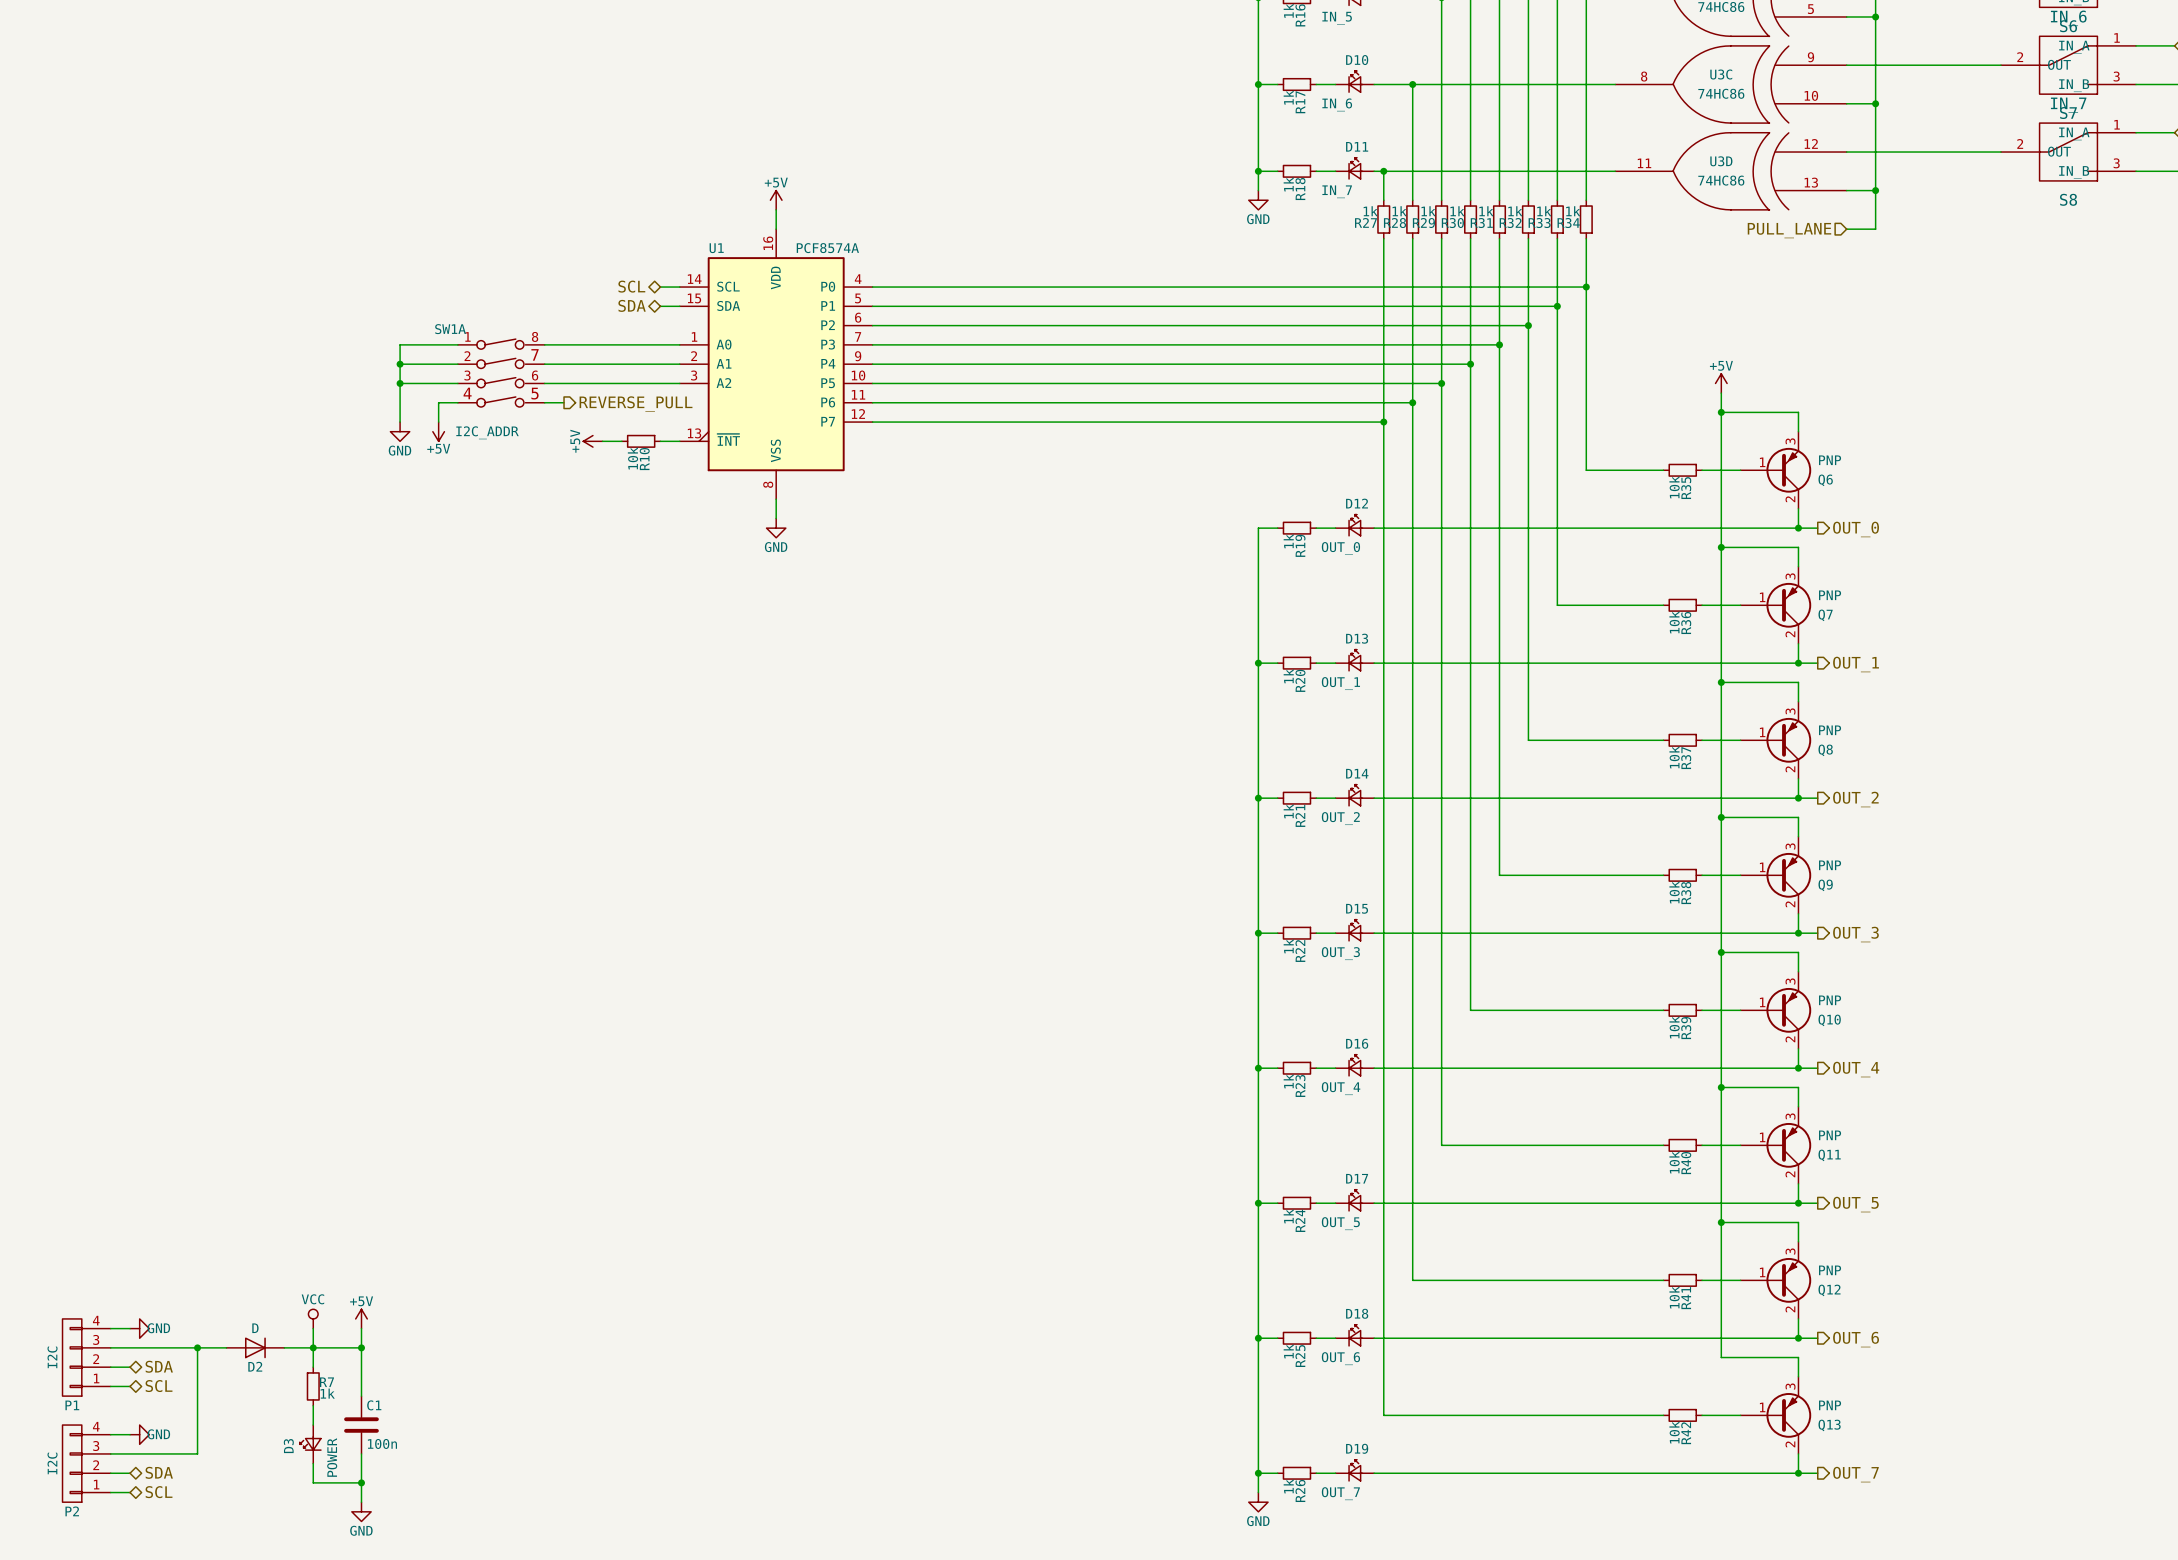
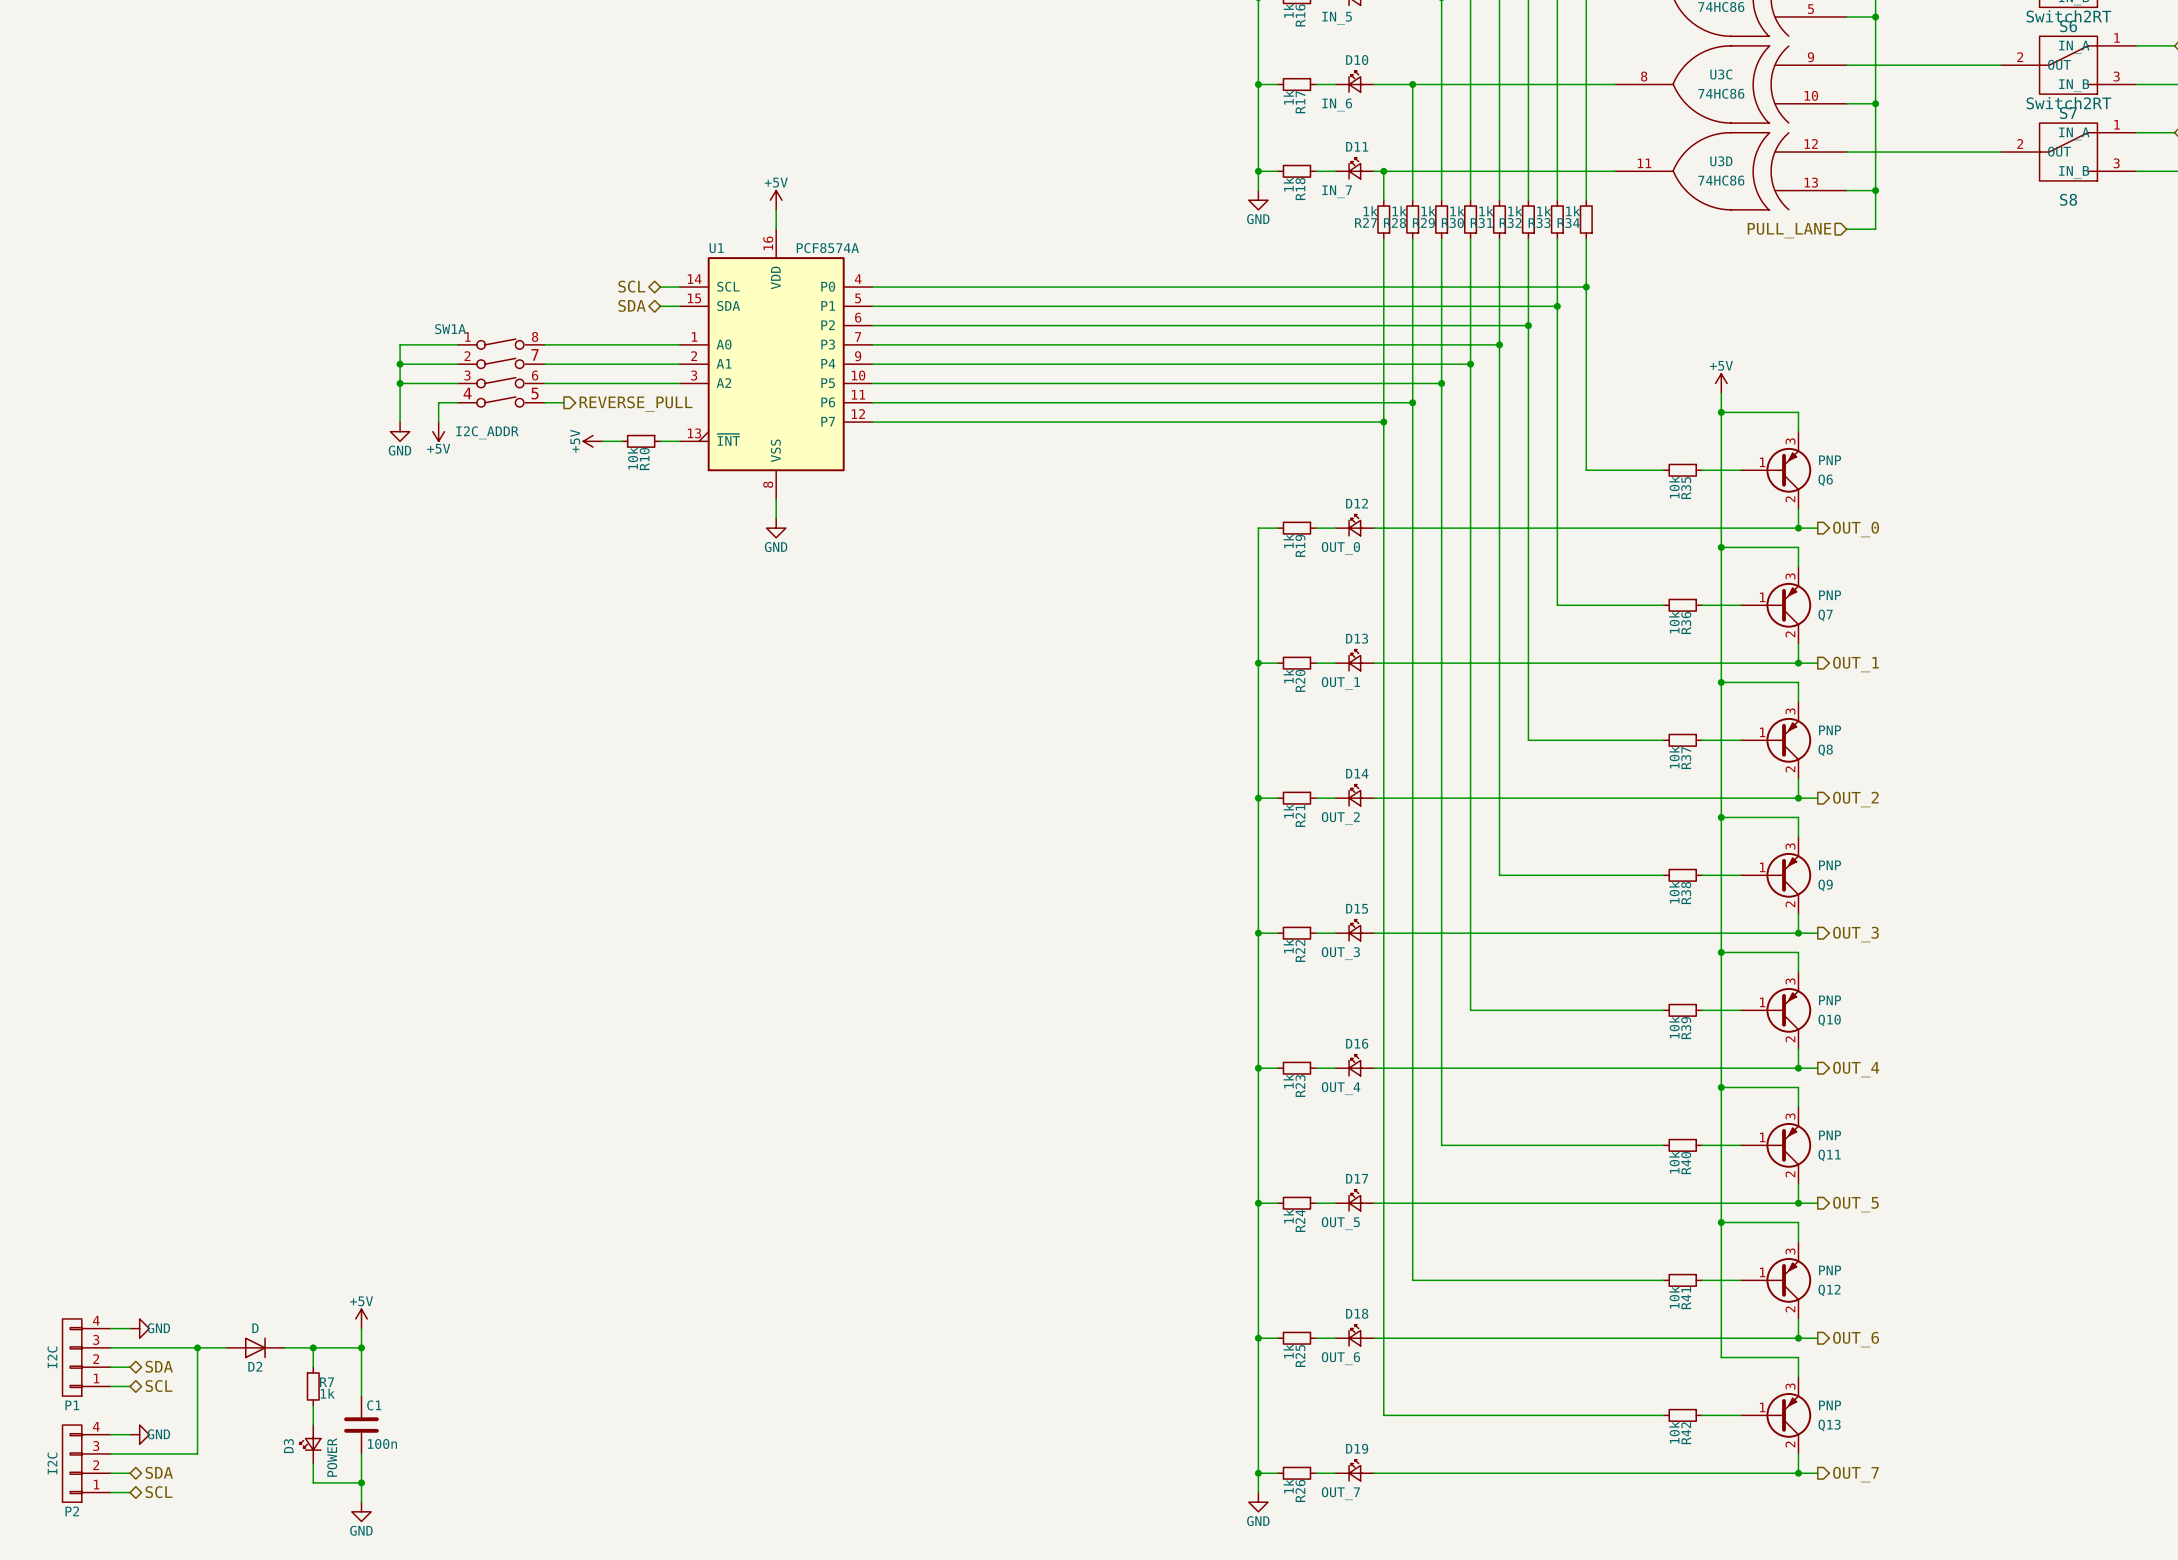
S7 value: IN_6 (2068, 18) -> Switch2RT (2068, 16)
S8 value: IN_7 (2068, 105) -> Switch2RT (2068, 103)
power symbol: VCC (313, 1318) -> none
wire: (313, 1328) (313, 1347) -> none

